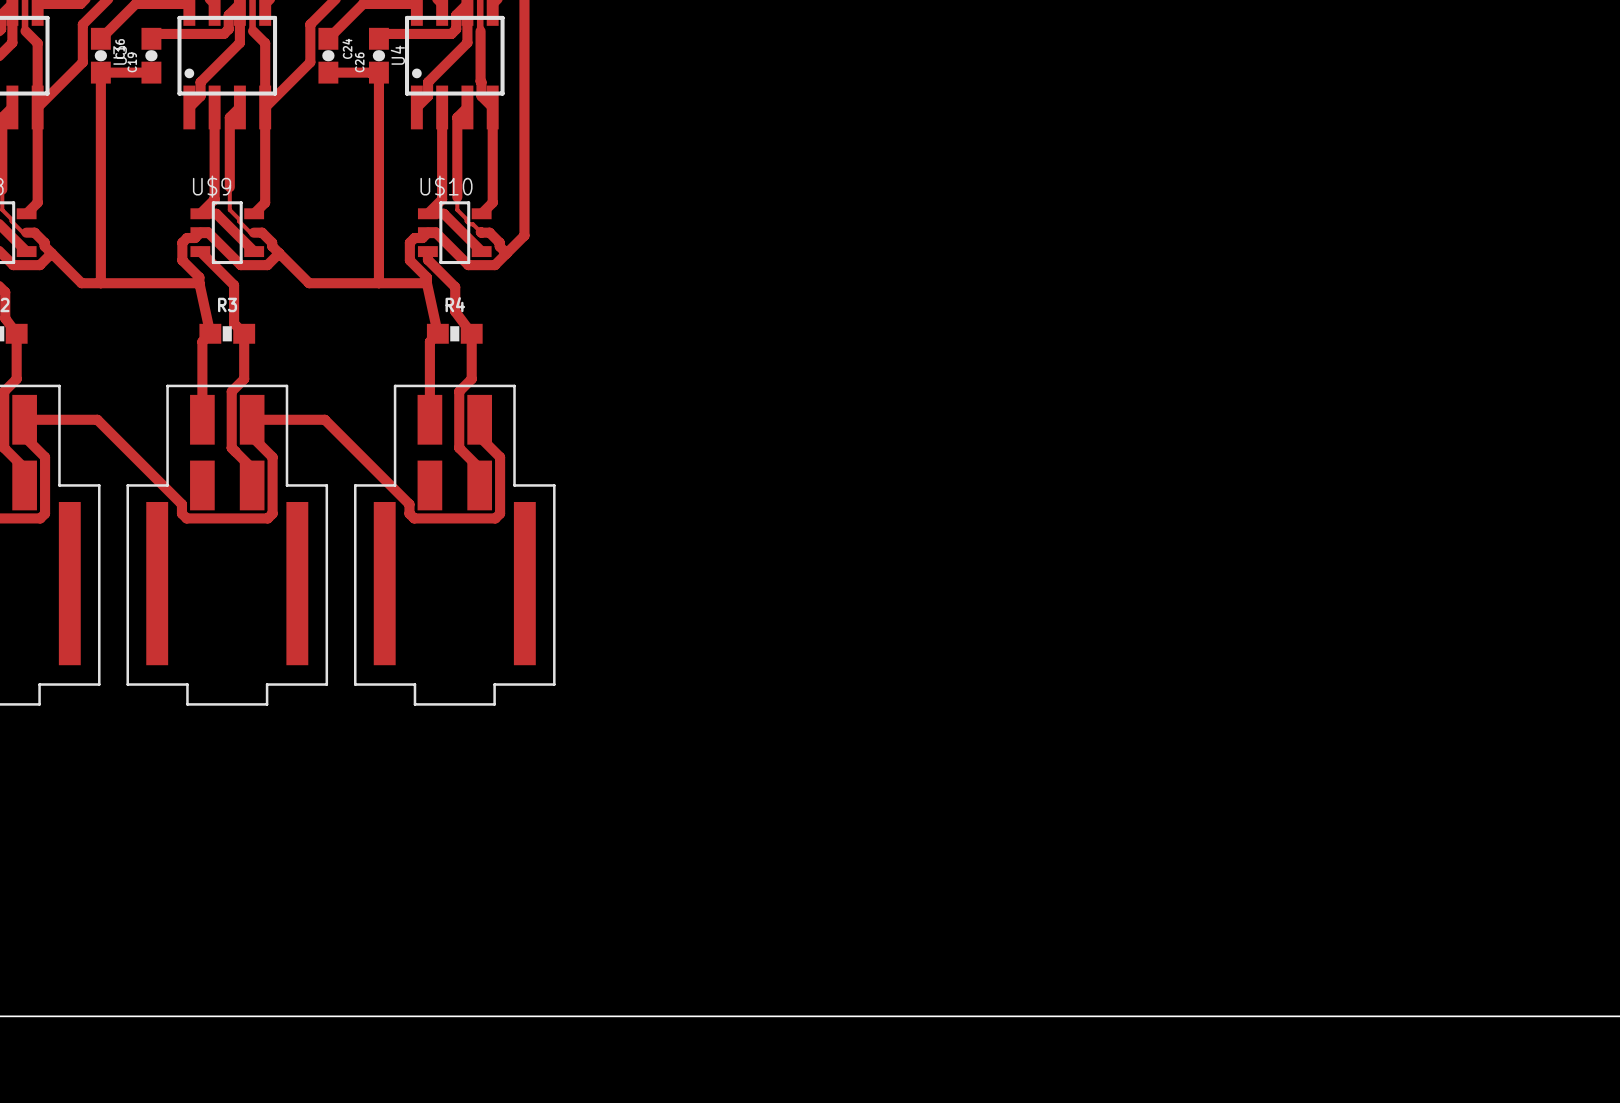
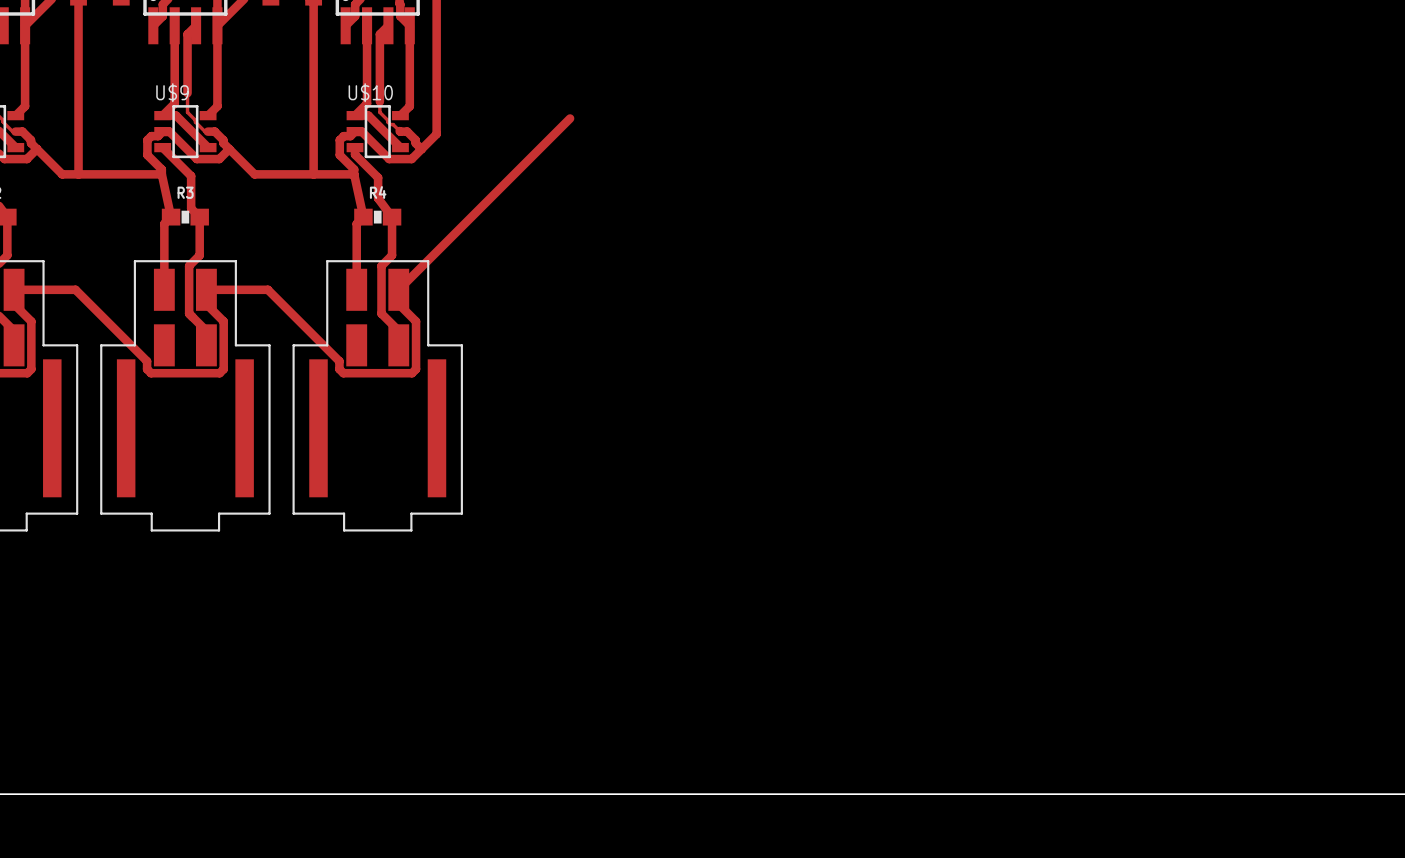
track: none -> (570, 118) (398, 289)

